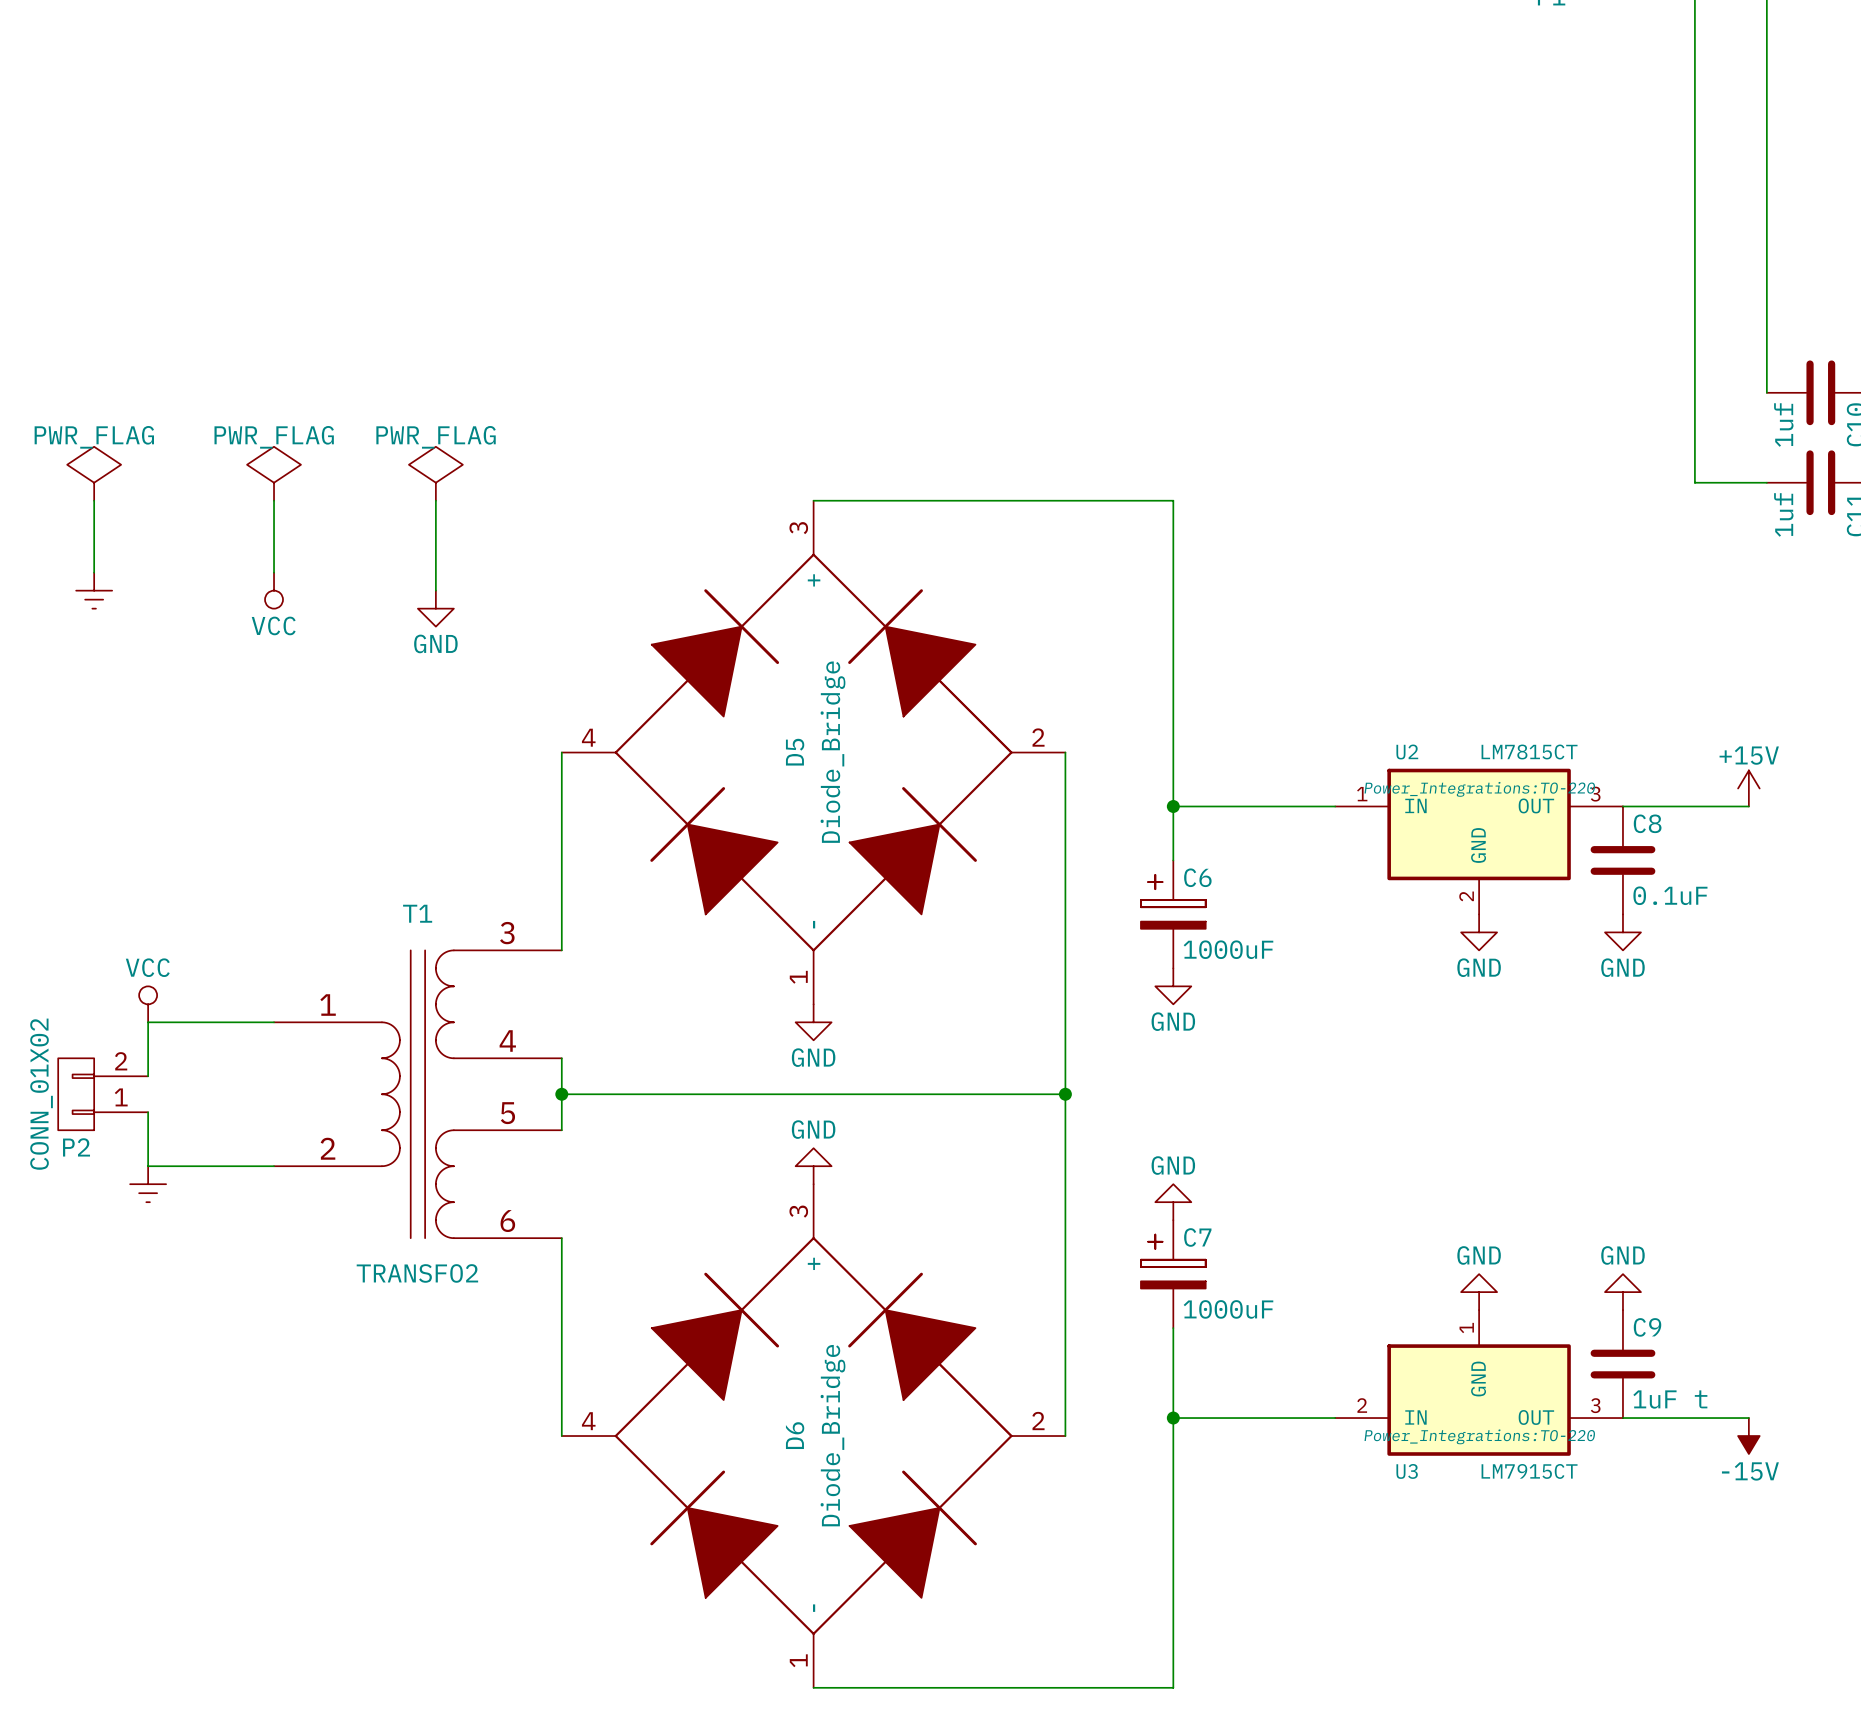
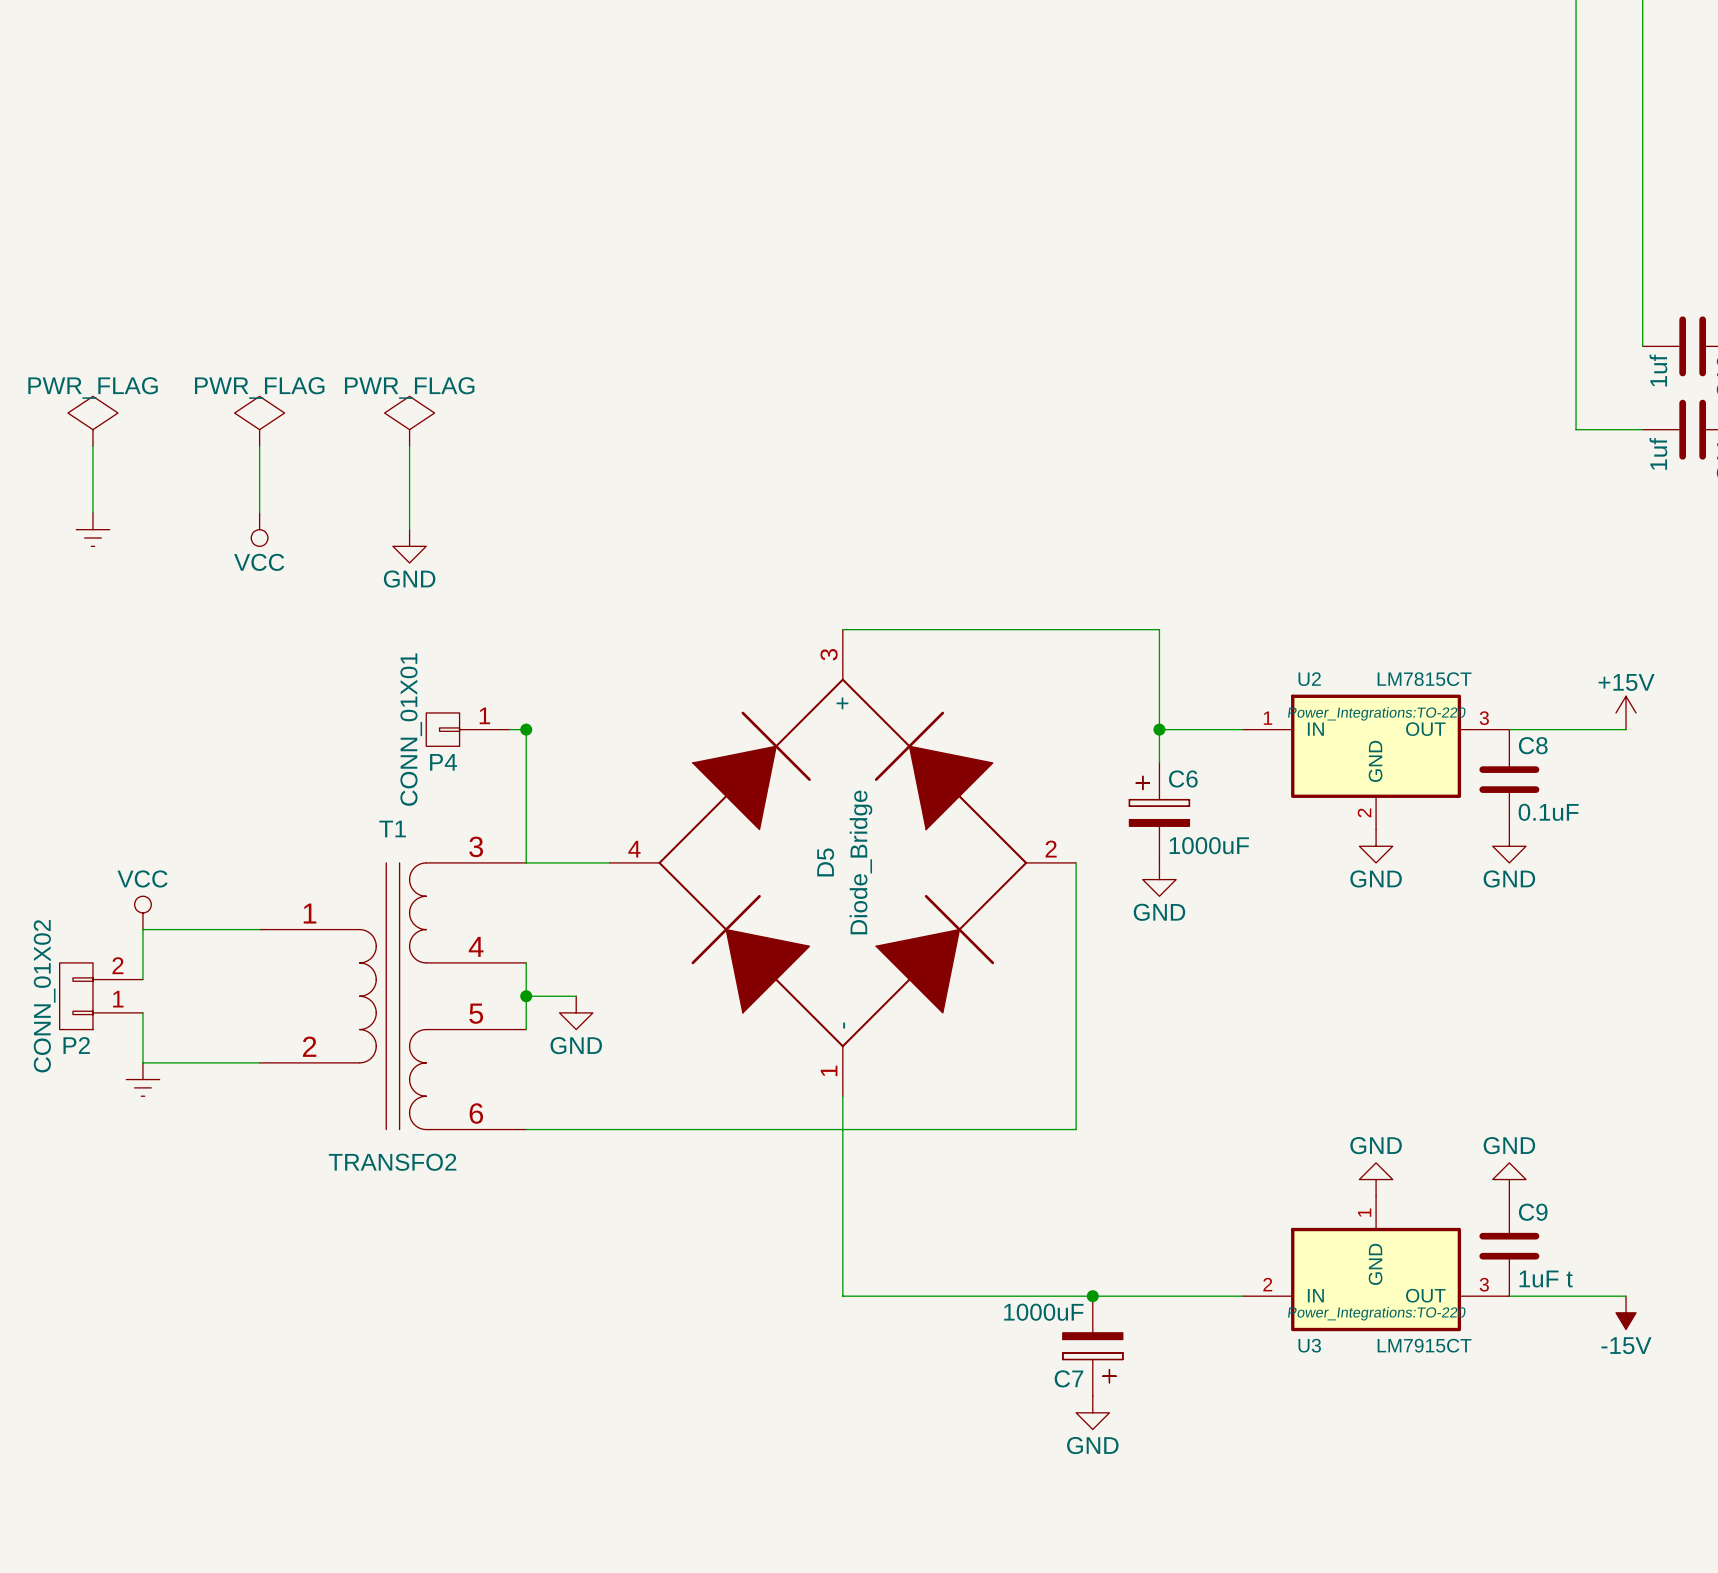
wire: (813, 500) (1173, 500) (1173, 860) -> none
wire: none -> (842, 629) (1159, 629) (1159, 762)
wire: (561, 752) (561, 806) -> (509, 729) (526, 729)
D5 position: (813, 752) -> (842, 862)
wire: (1065, 752) (1065, 1436) -> none
P4: none -> CONN_01X01 (467, 729)
junction: none -> (526, 729)
wire: (1173, 806) (1245, 806) -> none
junction position: (1173, 806) -> (1159, 729)
C6 position: (1173, 914) -> (1159, 812)
wire: none -> (526, 862) (609, 862)
power symbol position: GND (1173, 986) -> GND (1159, 879)
power symbol: GND (813, 1022) -> none
wire: (615, 1094) (1065, 1094) -> none
junction: (1065, 1094) -> none
power symbol: none -> GND (576, 1012)
power symbol: GND (813, 1166) -> none
wire: none -> (842, 1096) (842, 1296) (1092, 1296)
power symbol: GND (1173, 1202) -> none
wire: (561, 1238) (561, 1436) -> (526, 1129) (1076, 1129) (1076, 862)
C7 rotation: 0° (1173, 1261) -> 180° (1092, 1357)
C7 position: (1173, 1274) -> (1092, 1346)
wire: (1173, 1328) (1173, 1687) (813, 1687) -> none
D6: Diode_Bridge (813, 1436) -> none
power symbol: none -> GND (1092, 1412)

